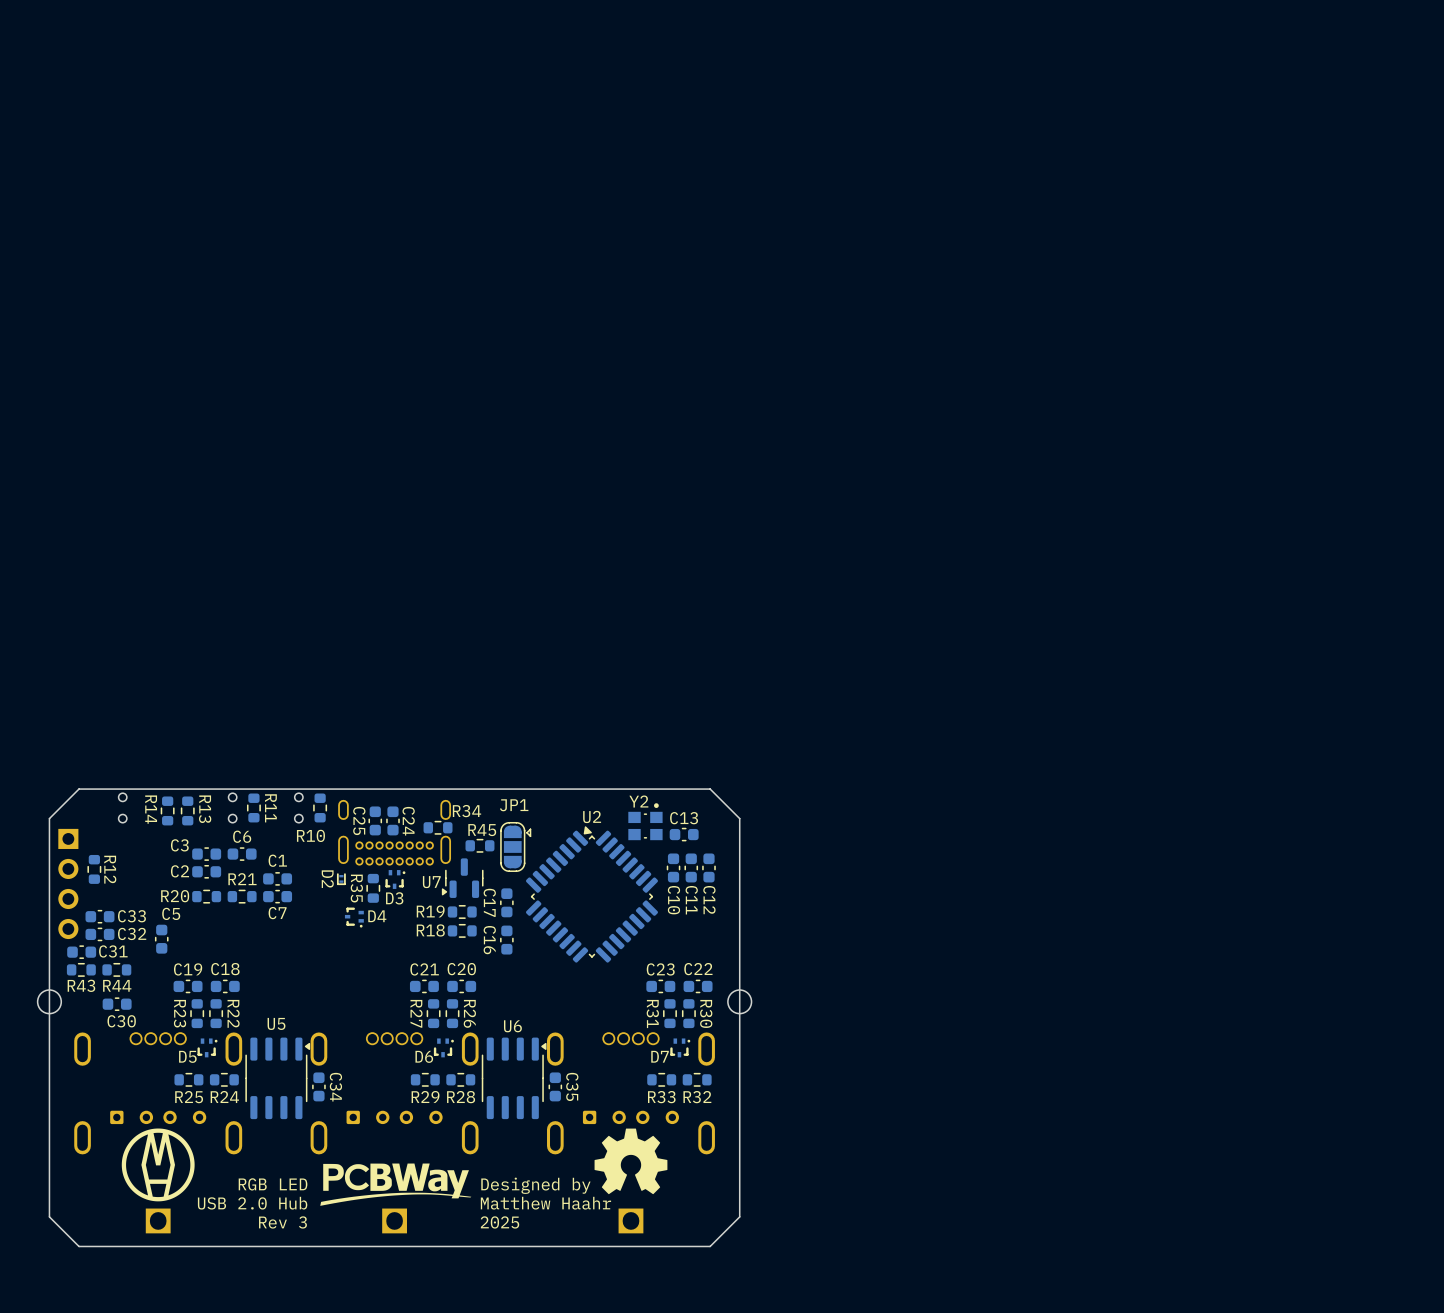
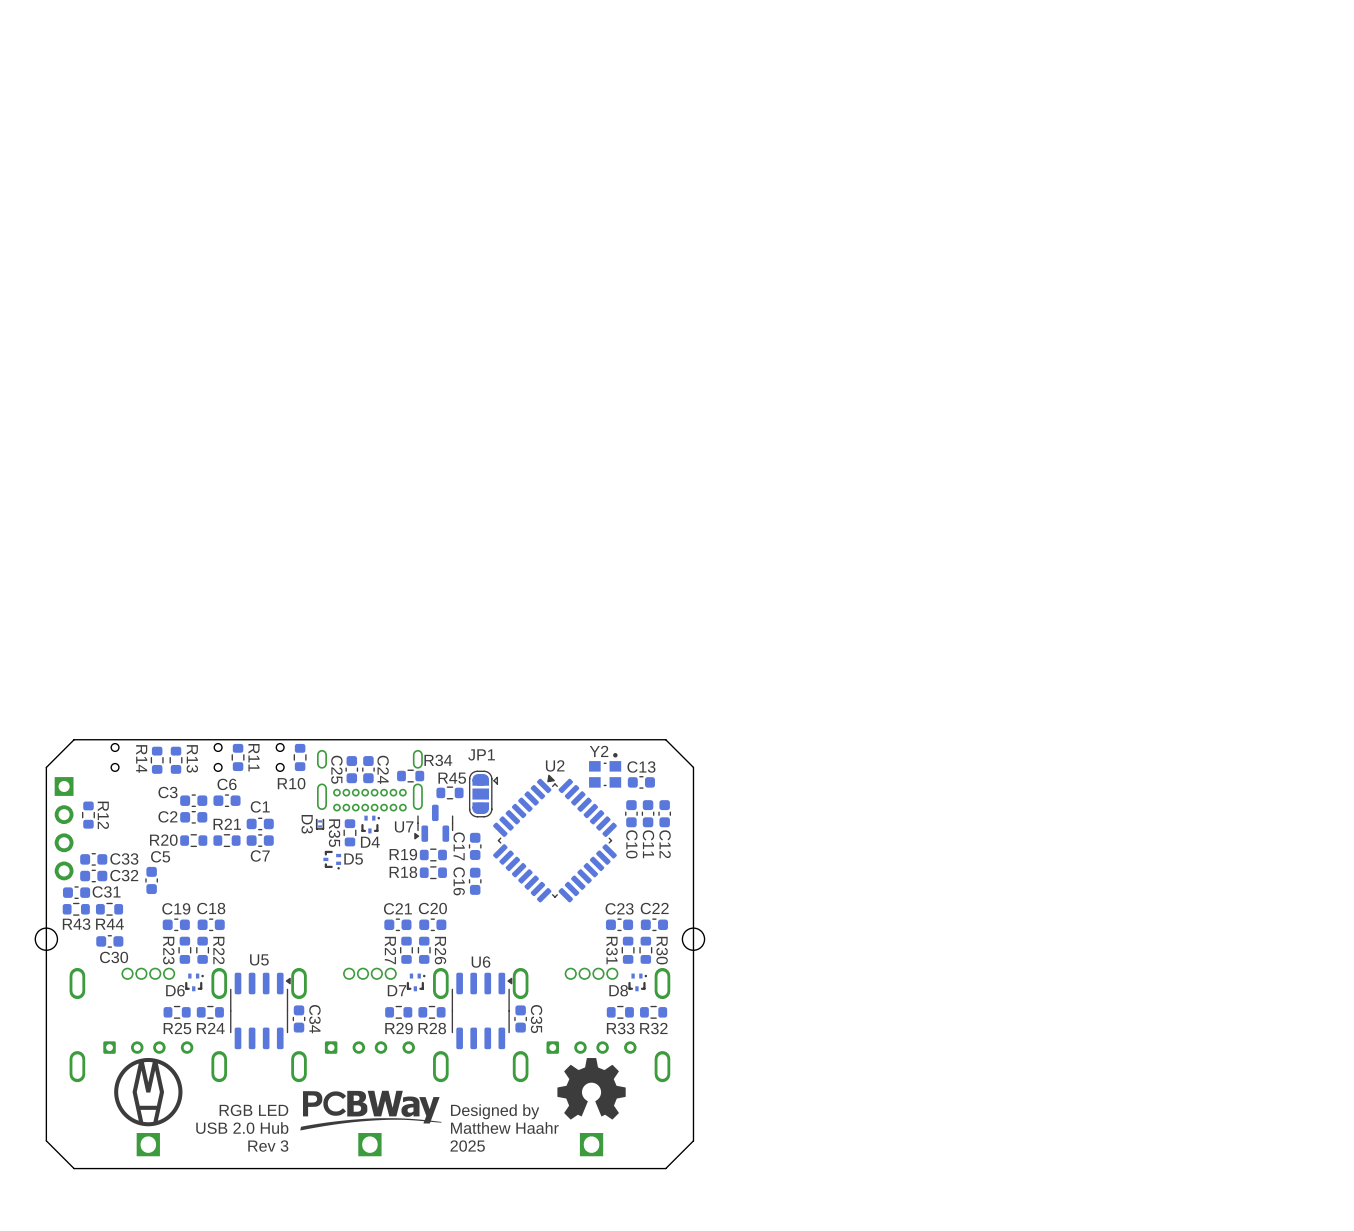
D2 name: D2 (327, 879) -> D3 (307, 824)
D3 name: D3 (394, 898) -> D4 (370, 842)
D4 name: D4 (377, 916) -> D5 (353, 859)
D5 name: D5 (187, 1056) -> D6 (175, 990)
D6 name: D6 (424, 1056) -> D7 (397, 990)
D7 name: D7 (660, 1056) -> D8 (618, 990)

